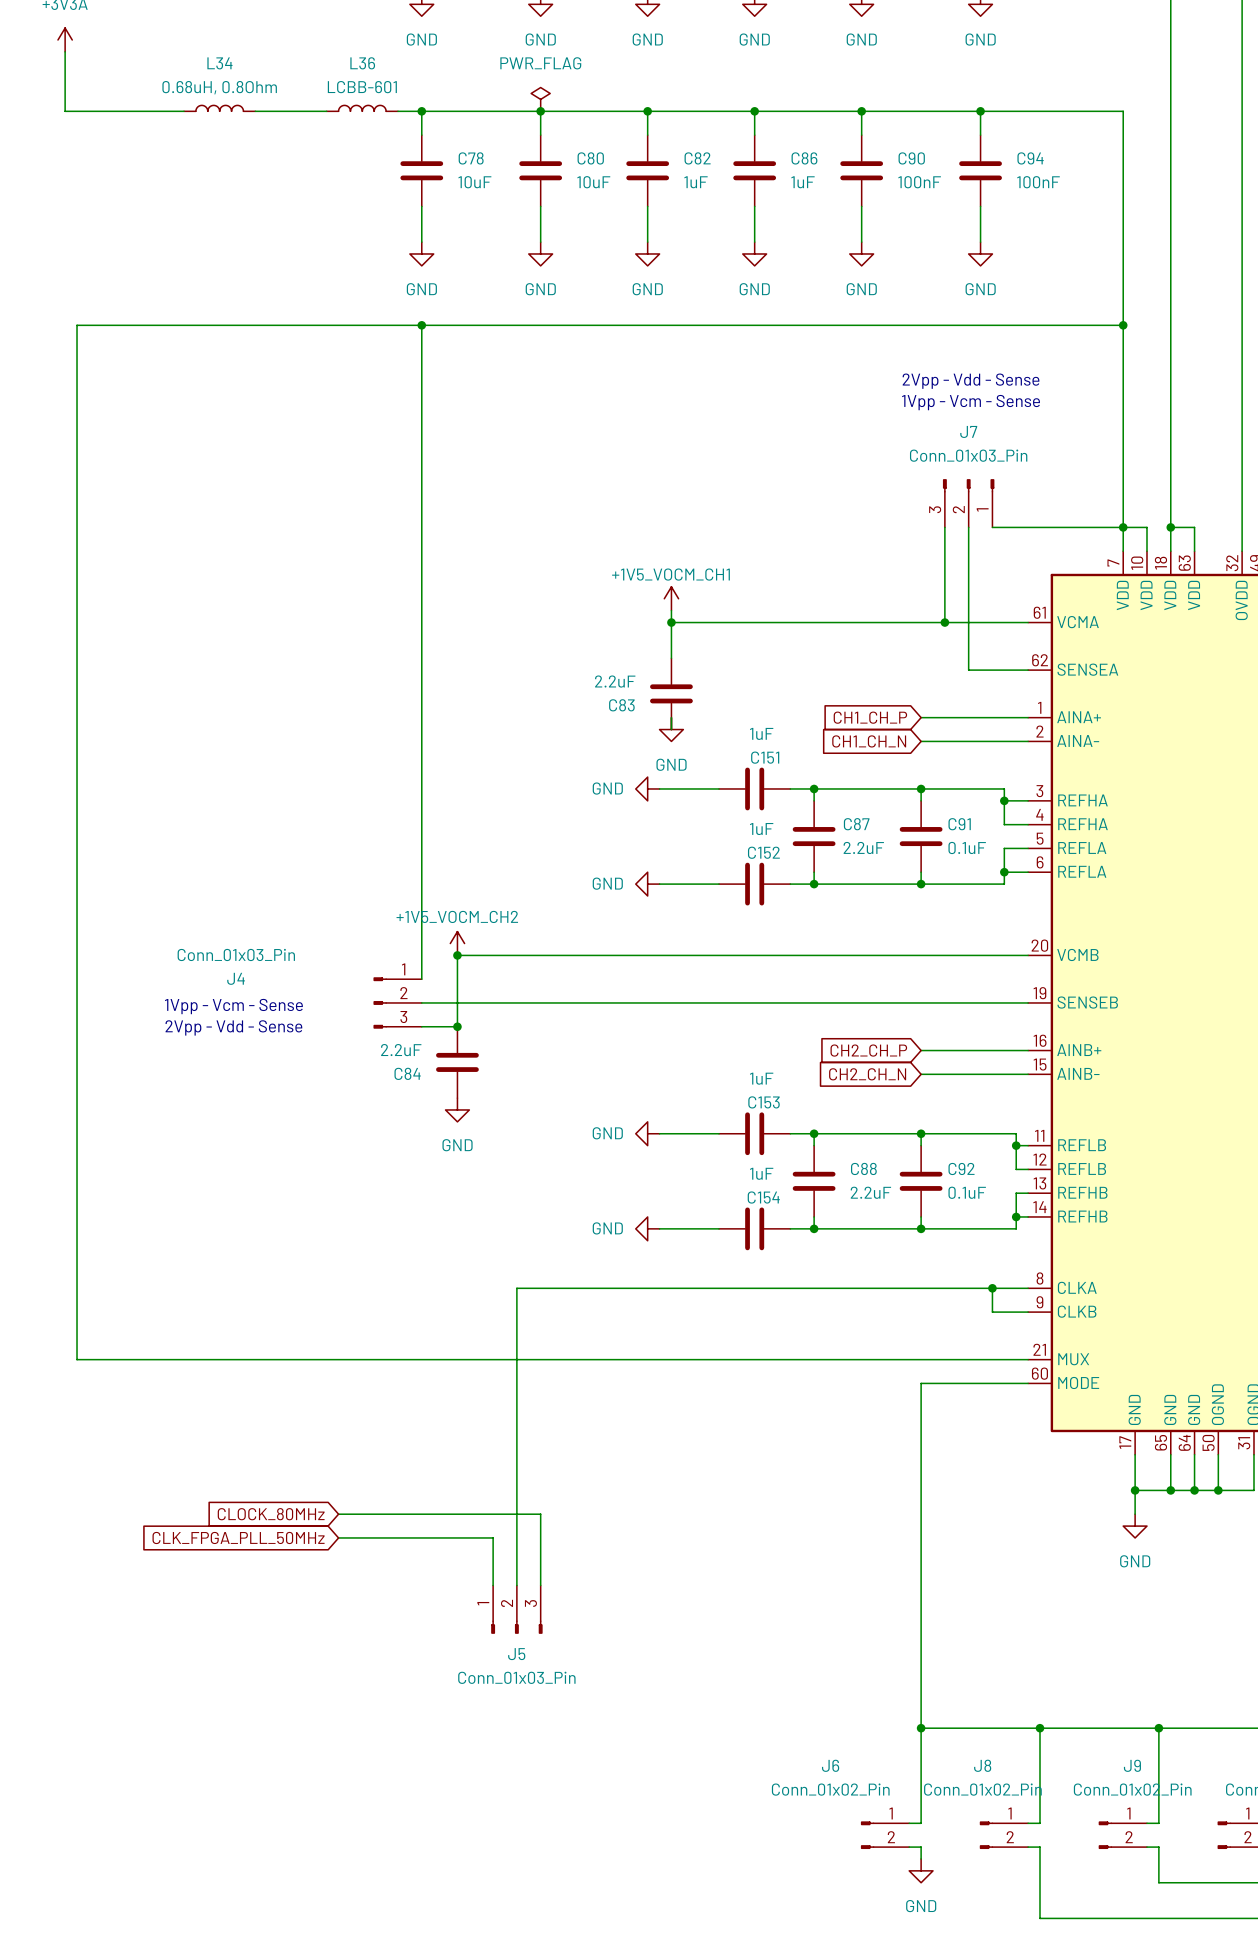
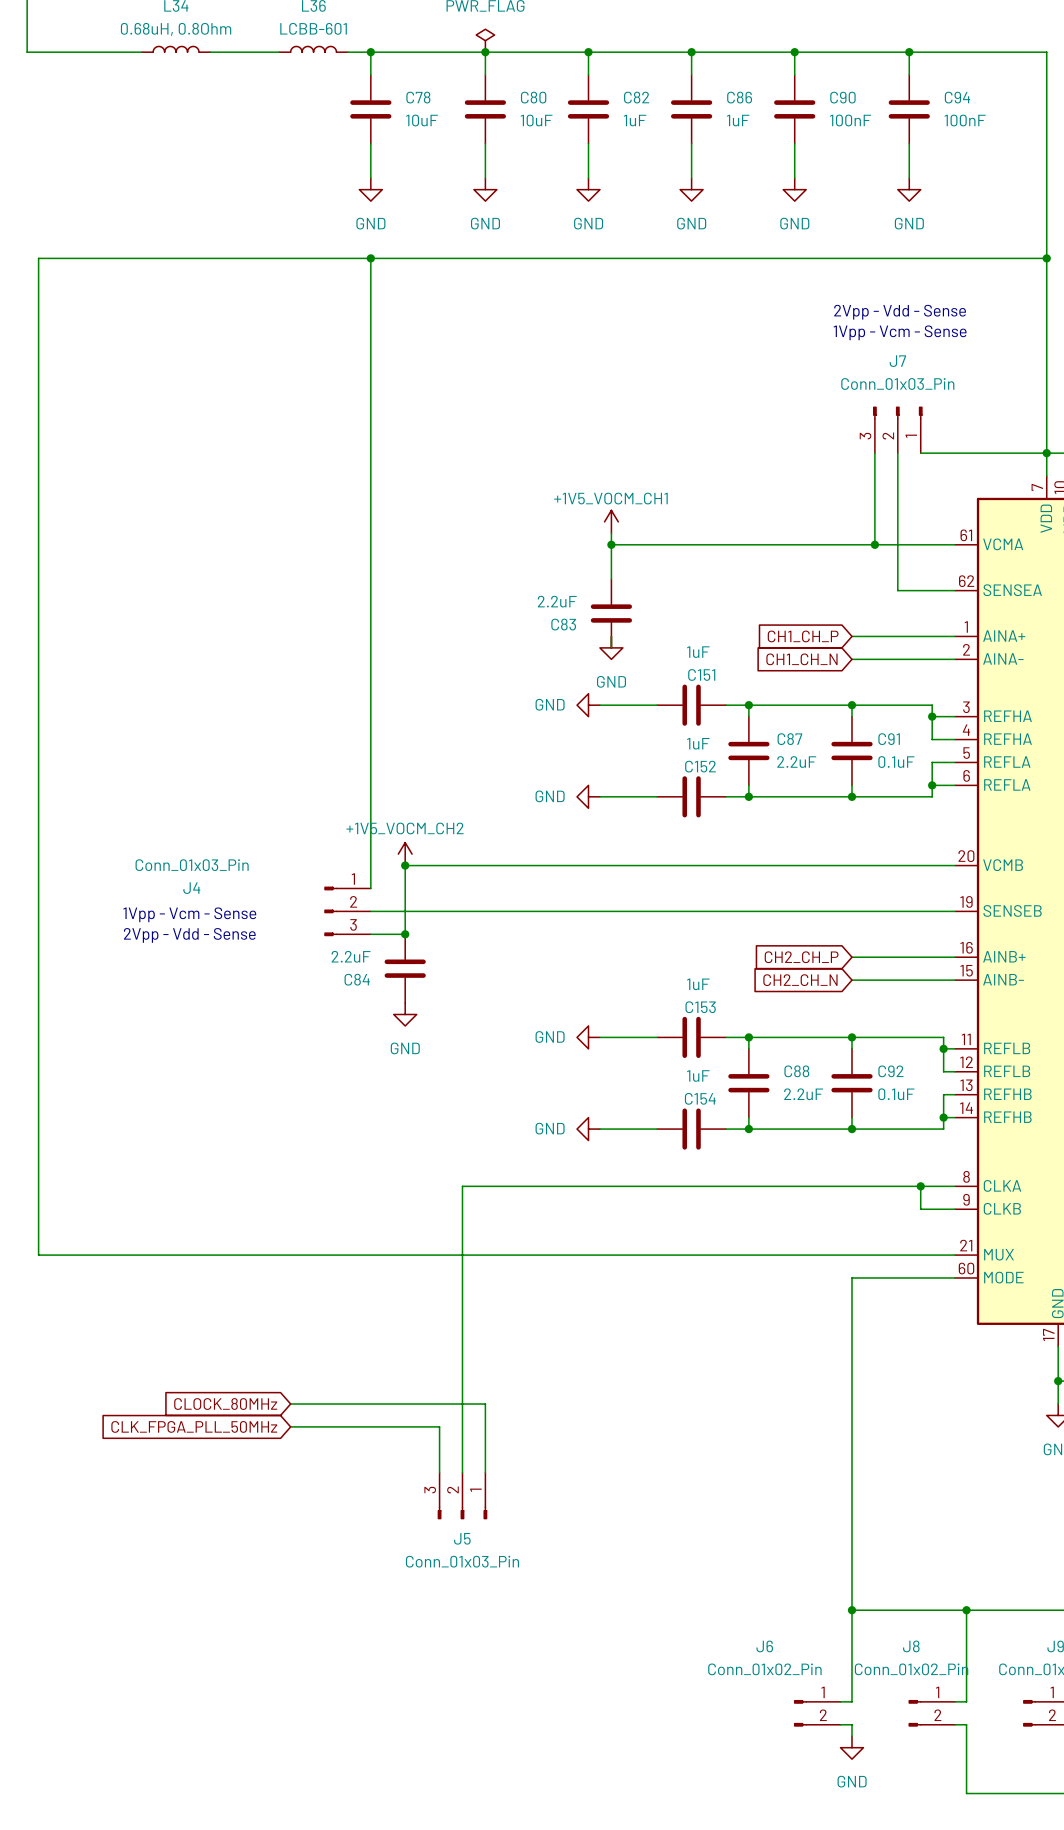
J5 flip: as is (516, 1627) -> left-right (462, 1512)

